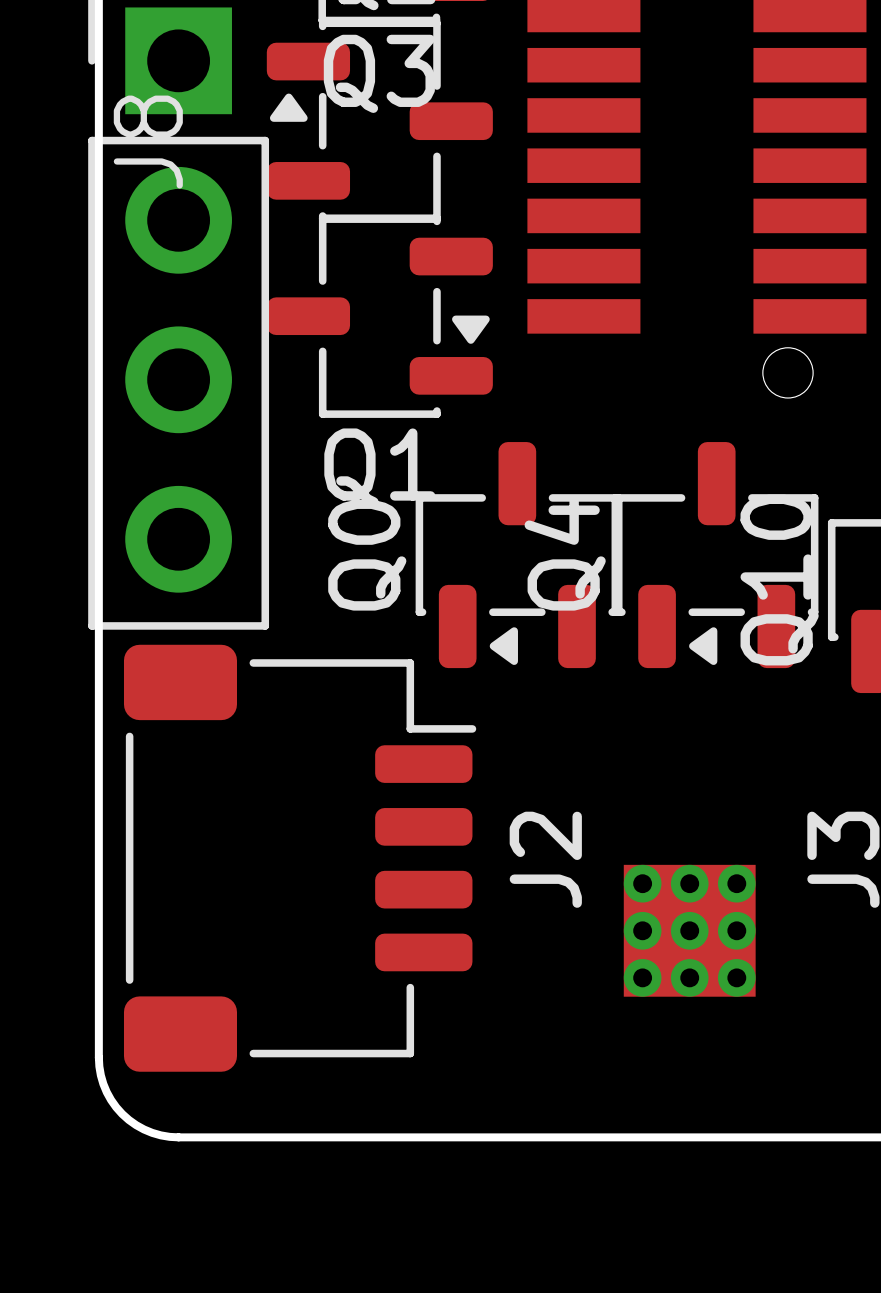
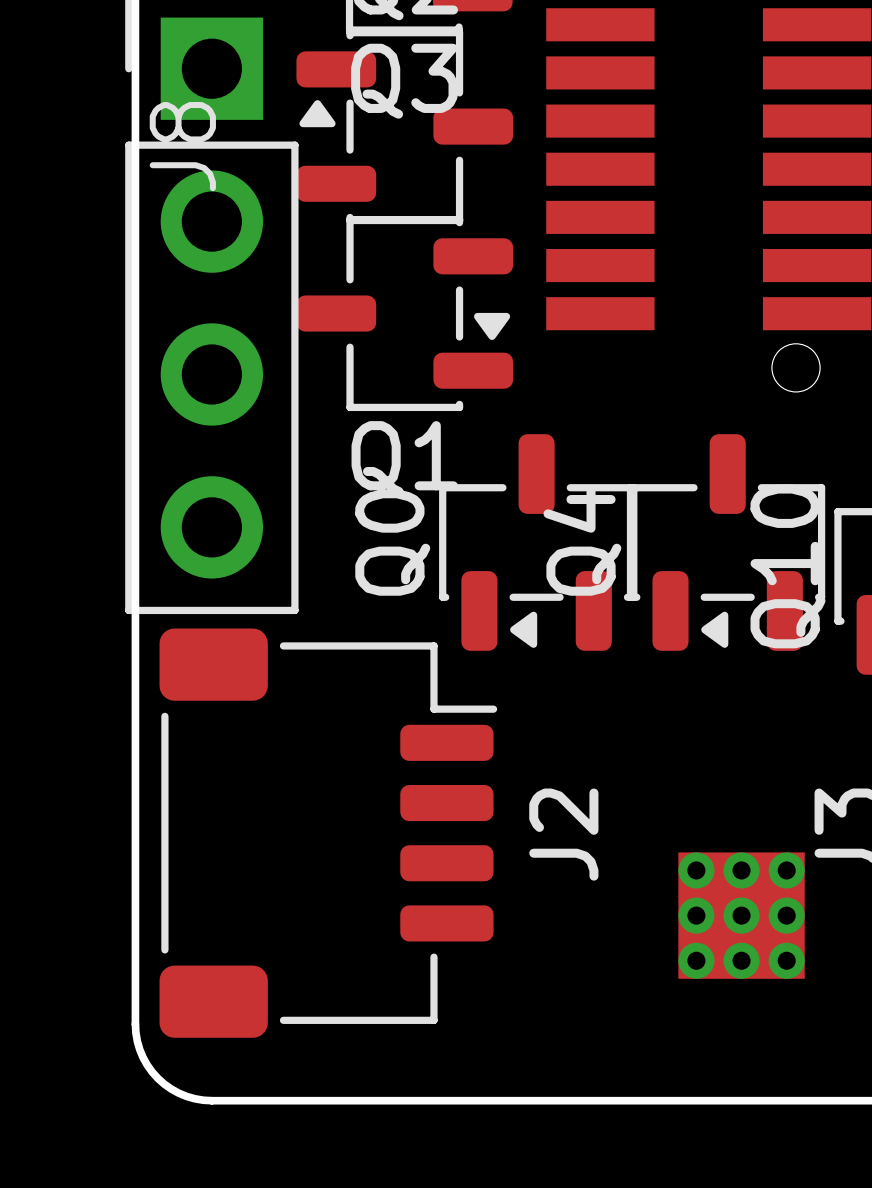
part position: (689, 930) -> (741, 915)

